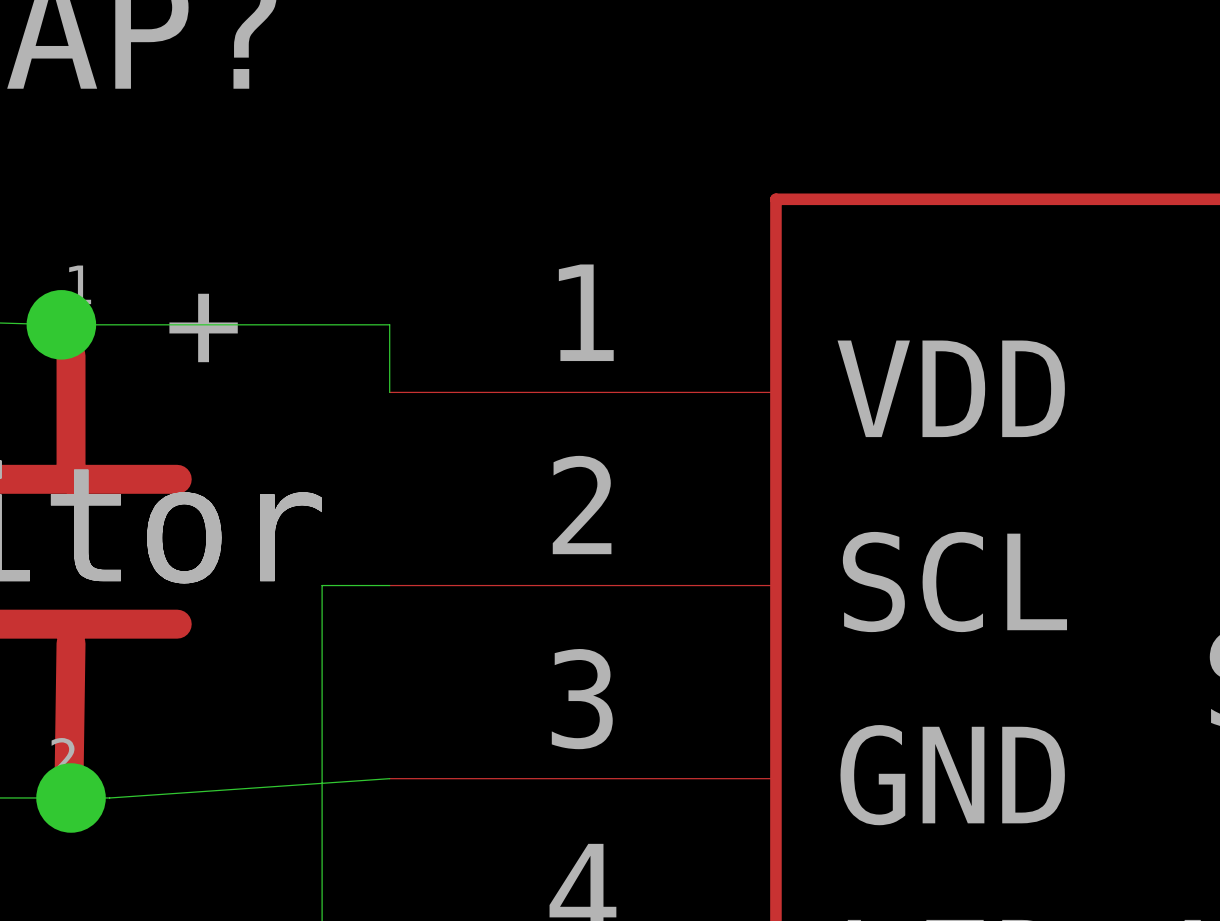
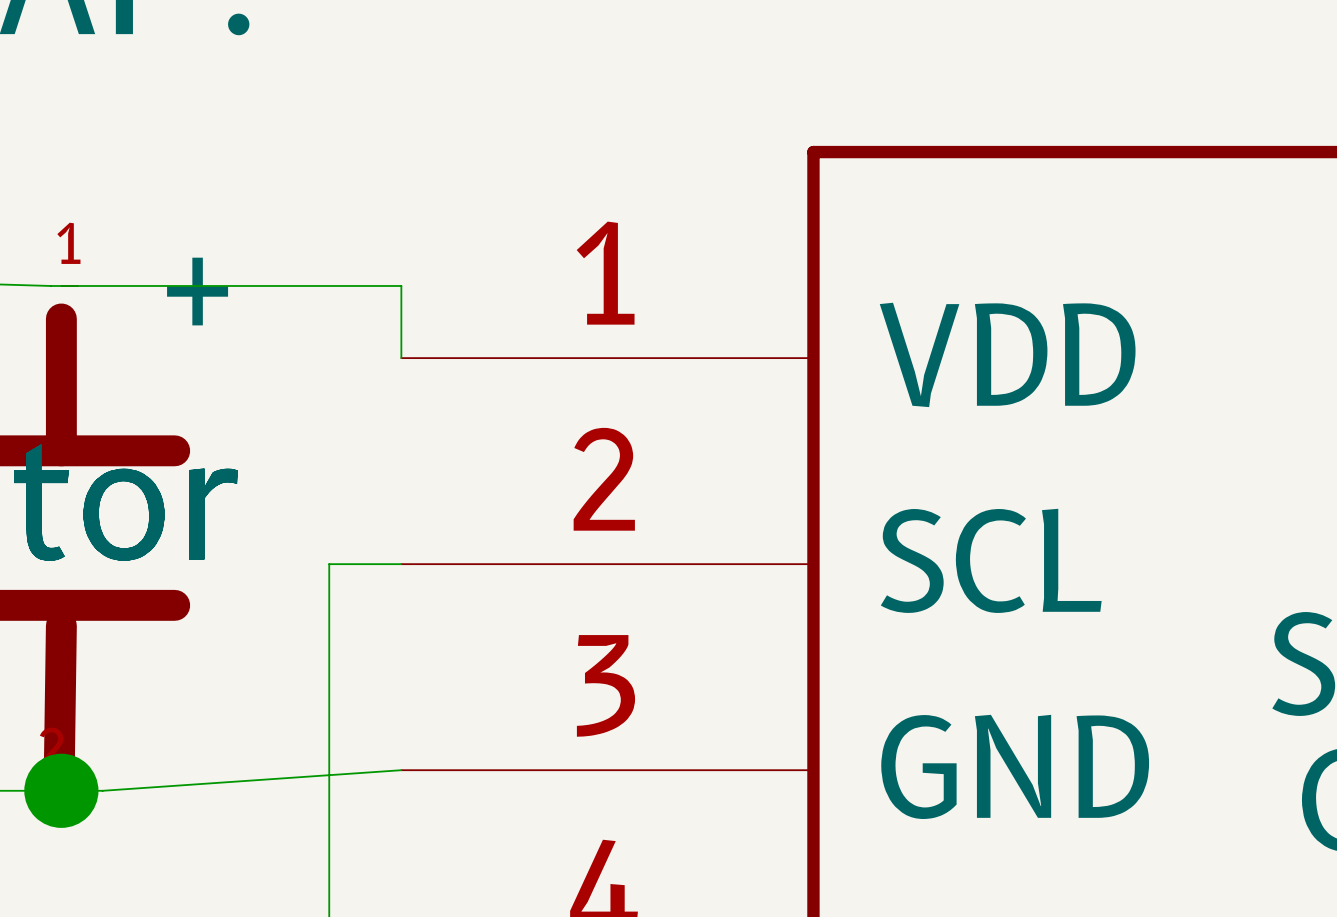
junction: (61, 324) -> none

